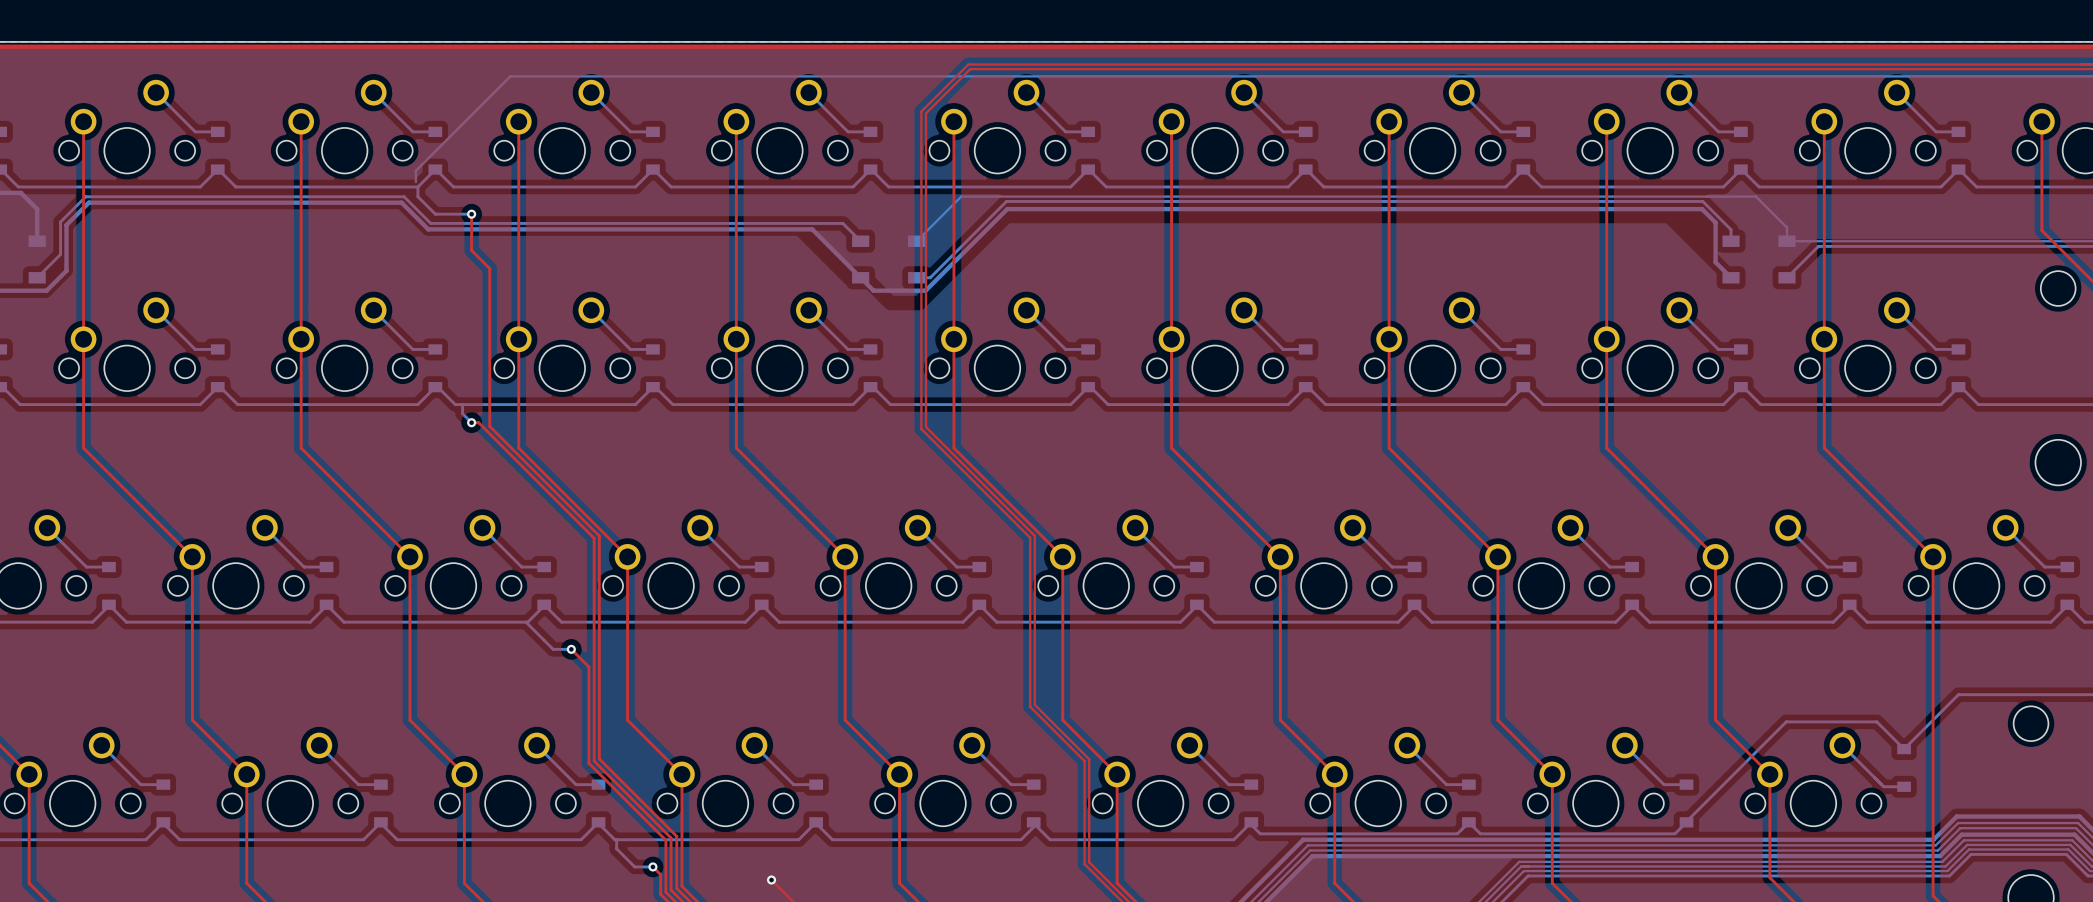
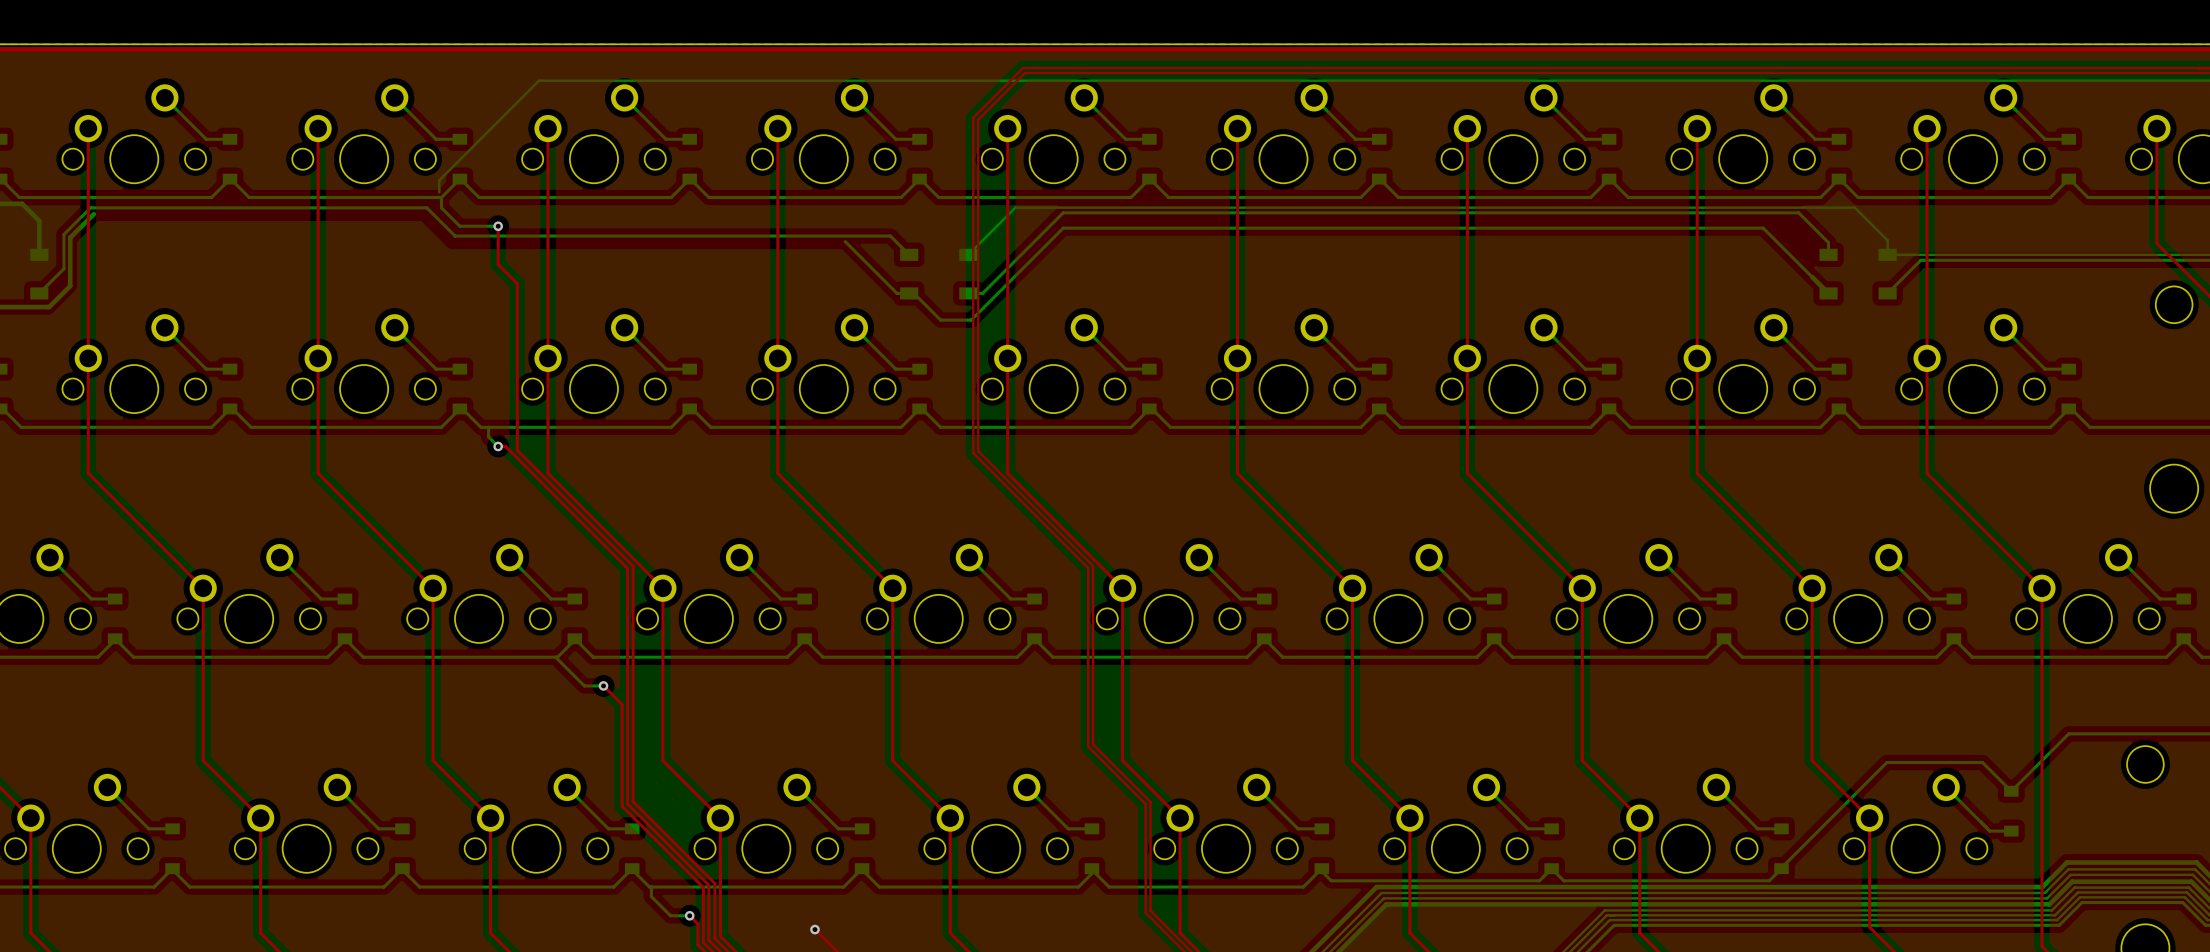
bottom track: (88, 202) (401, 202) (428, 229) (812, 229) (873, 290) (925, 290) (1007, 209) (1702, 209) (1715, 222) (1715, 262) -> (913, 293) (940, 320) (971, 320) (1063, 228) (1763, 228) (1812, 277)
bottom track: none -> (845, 241) (897, 293) (909, 293)

